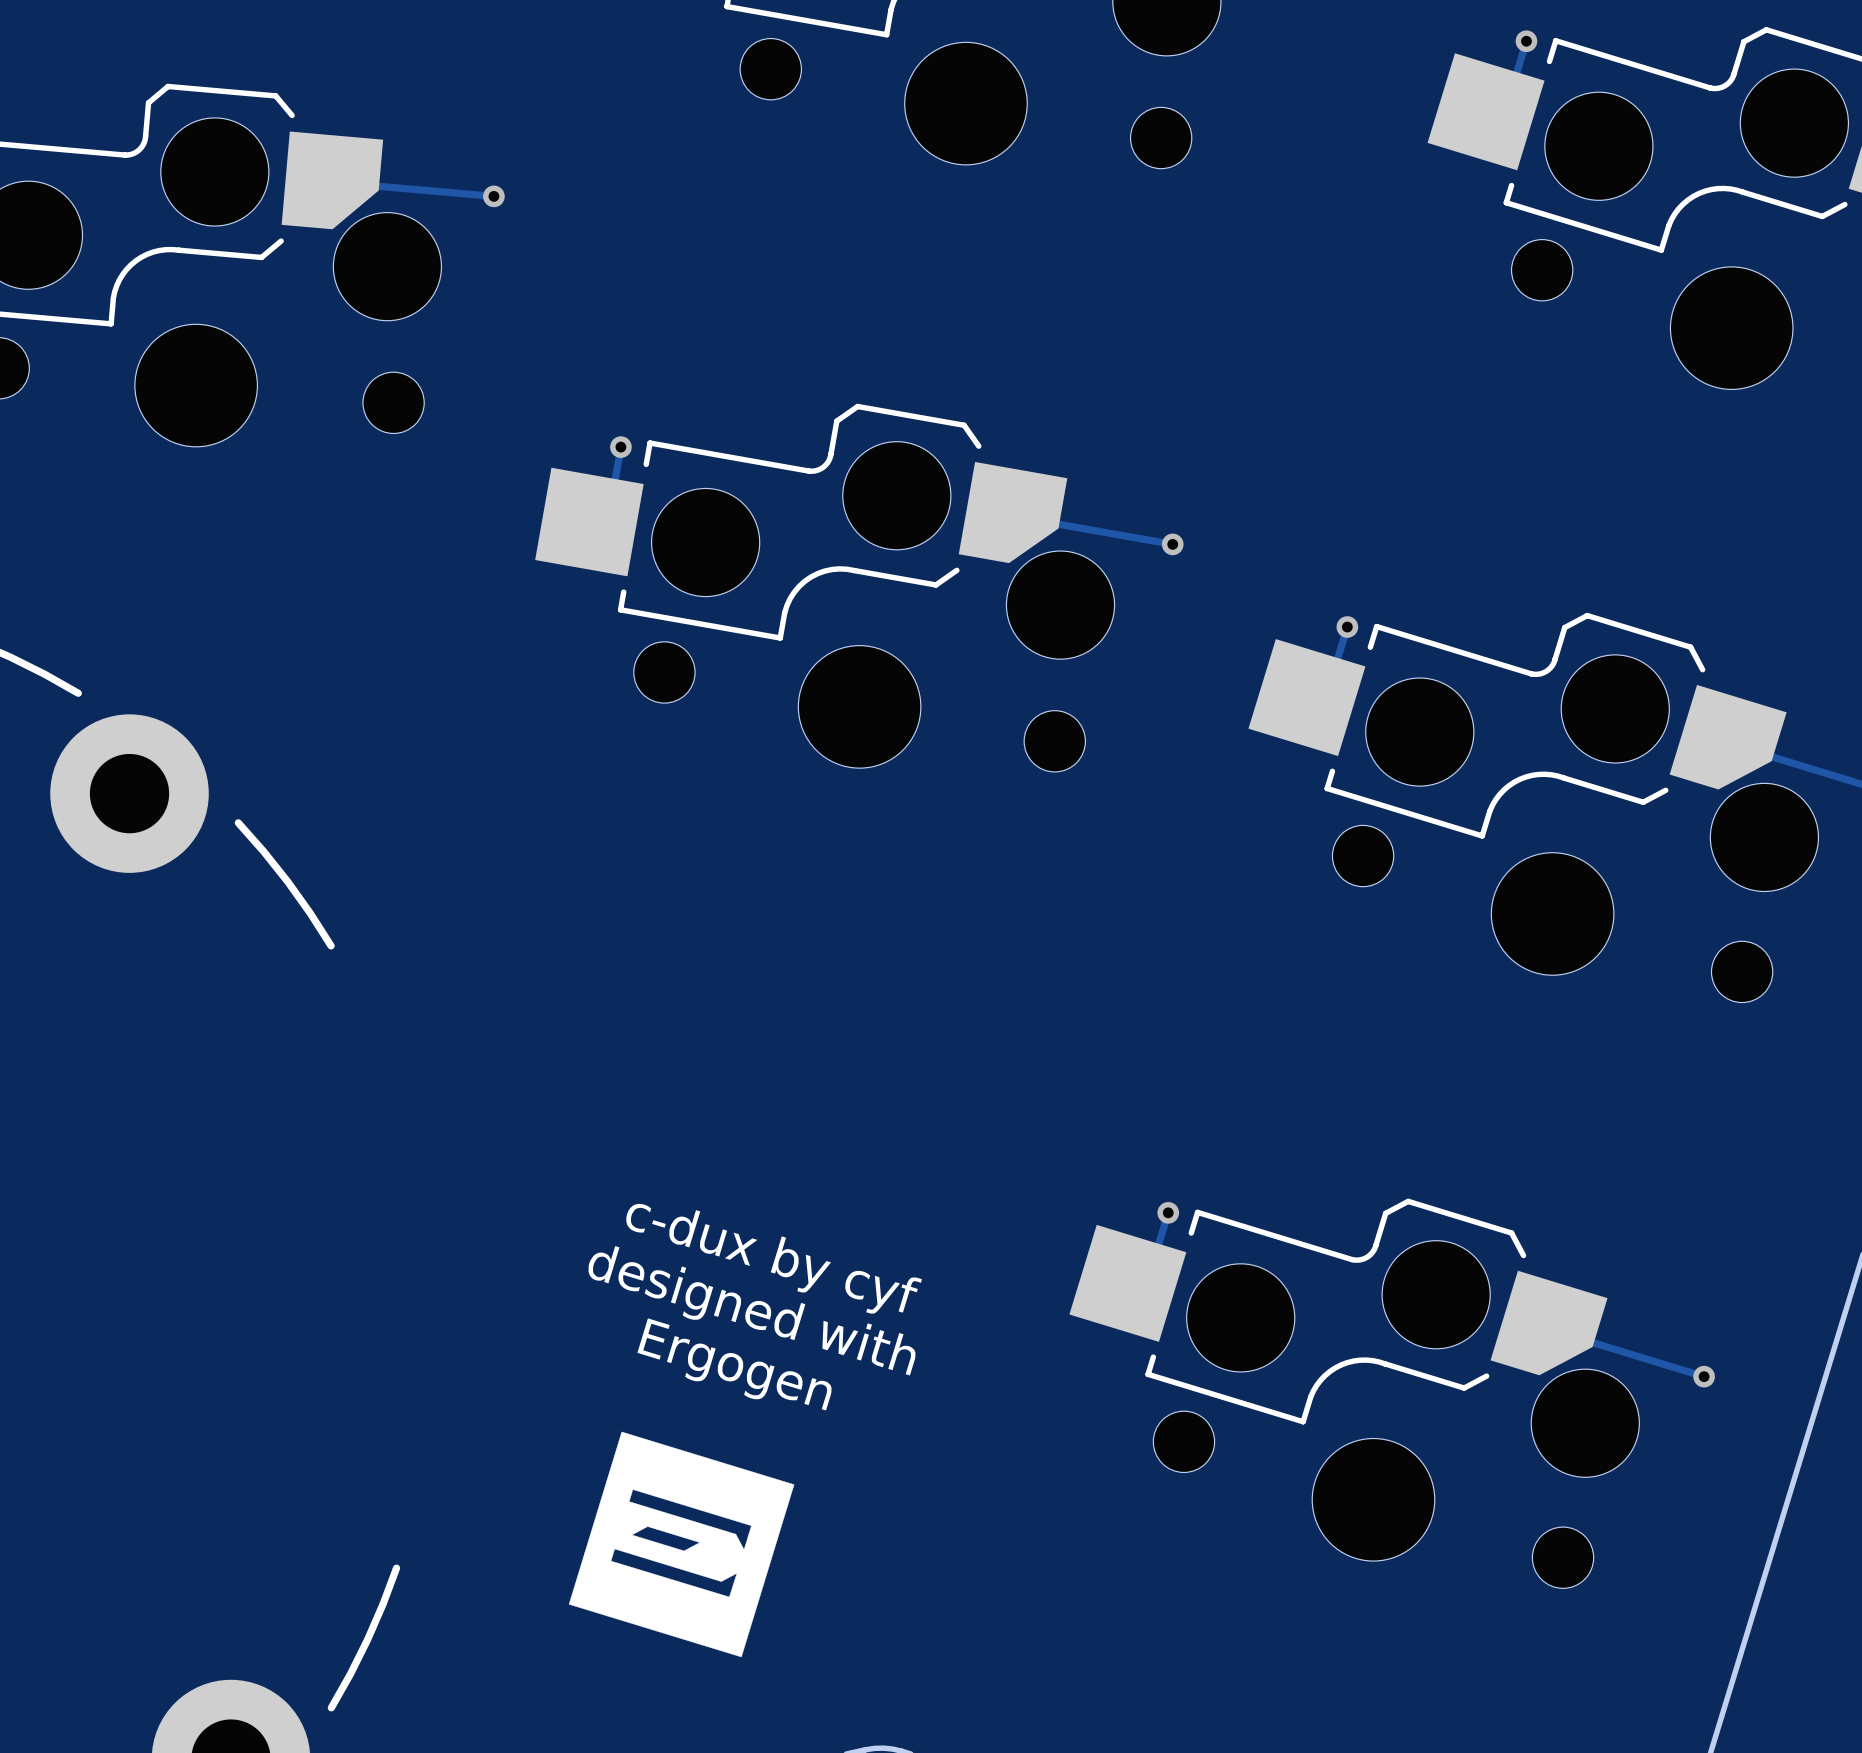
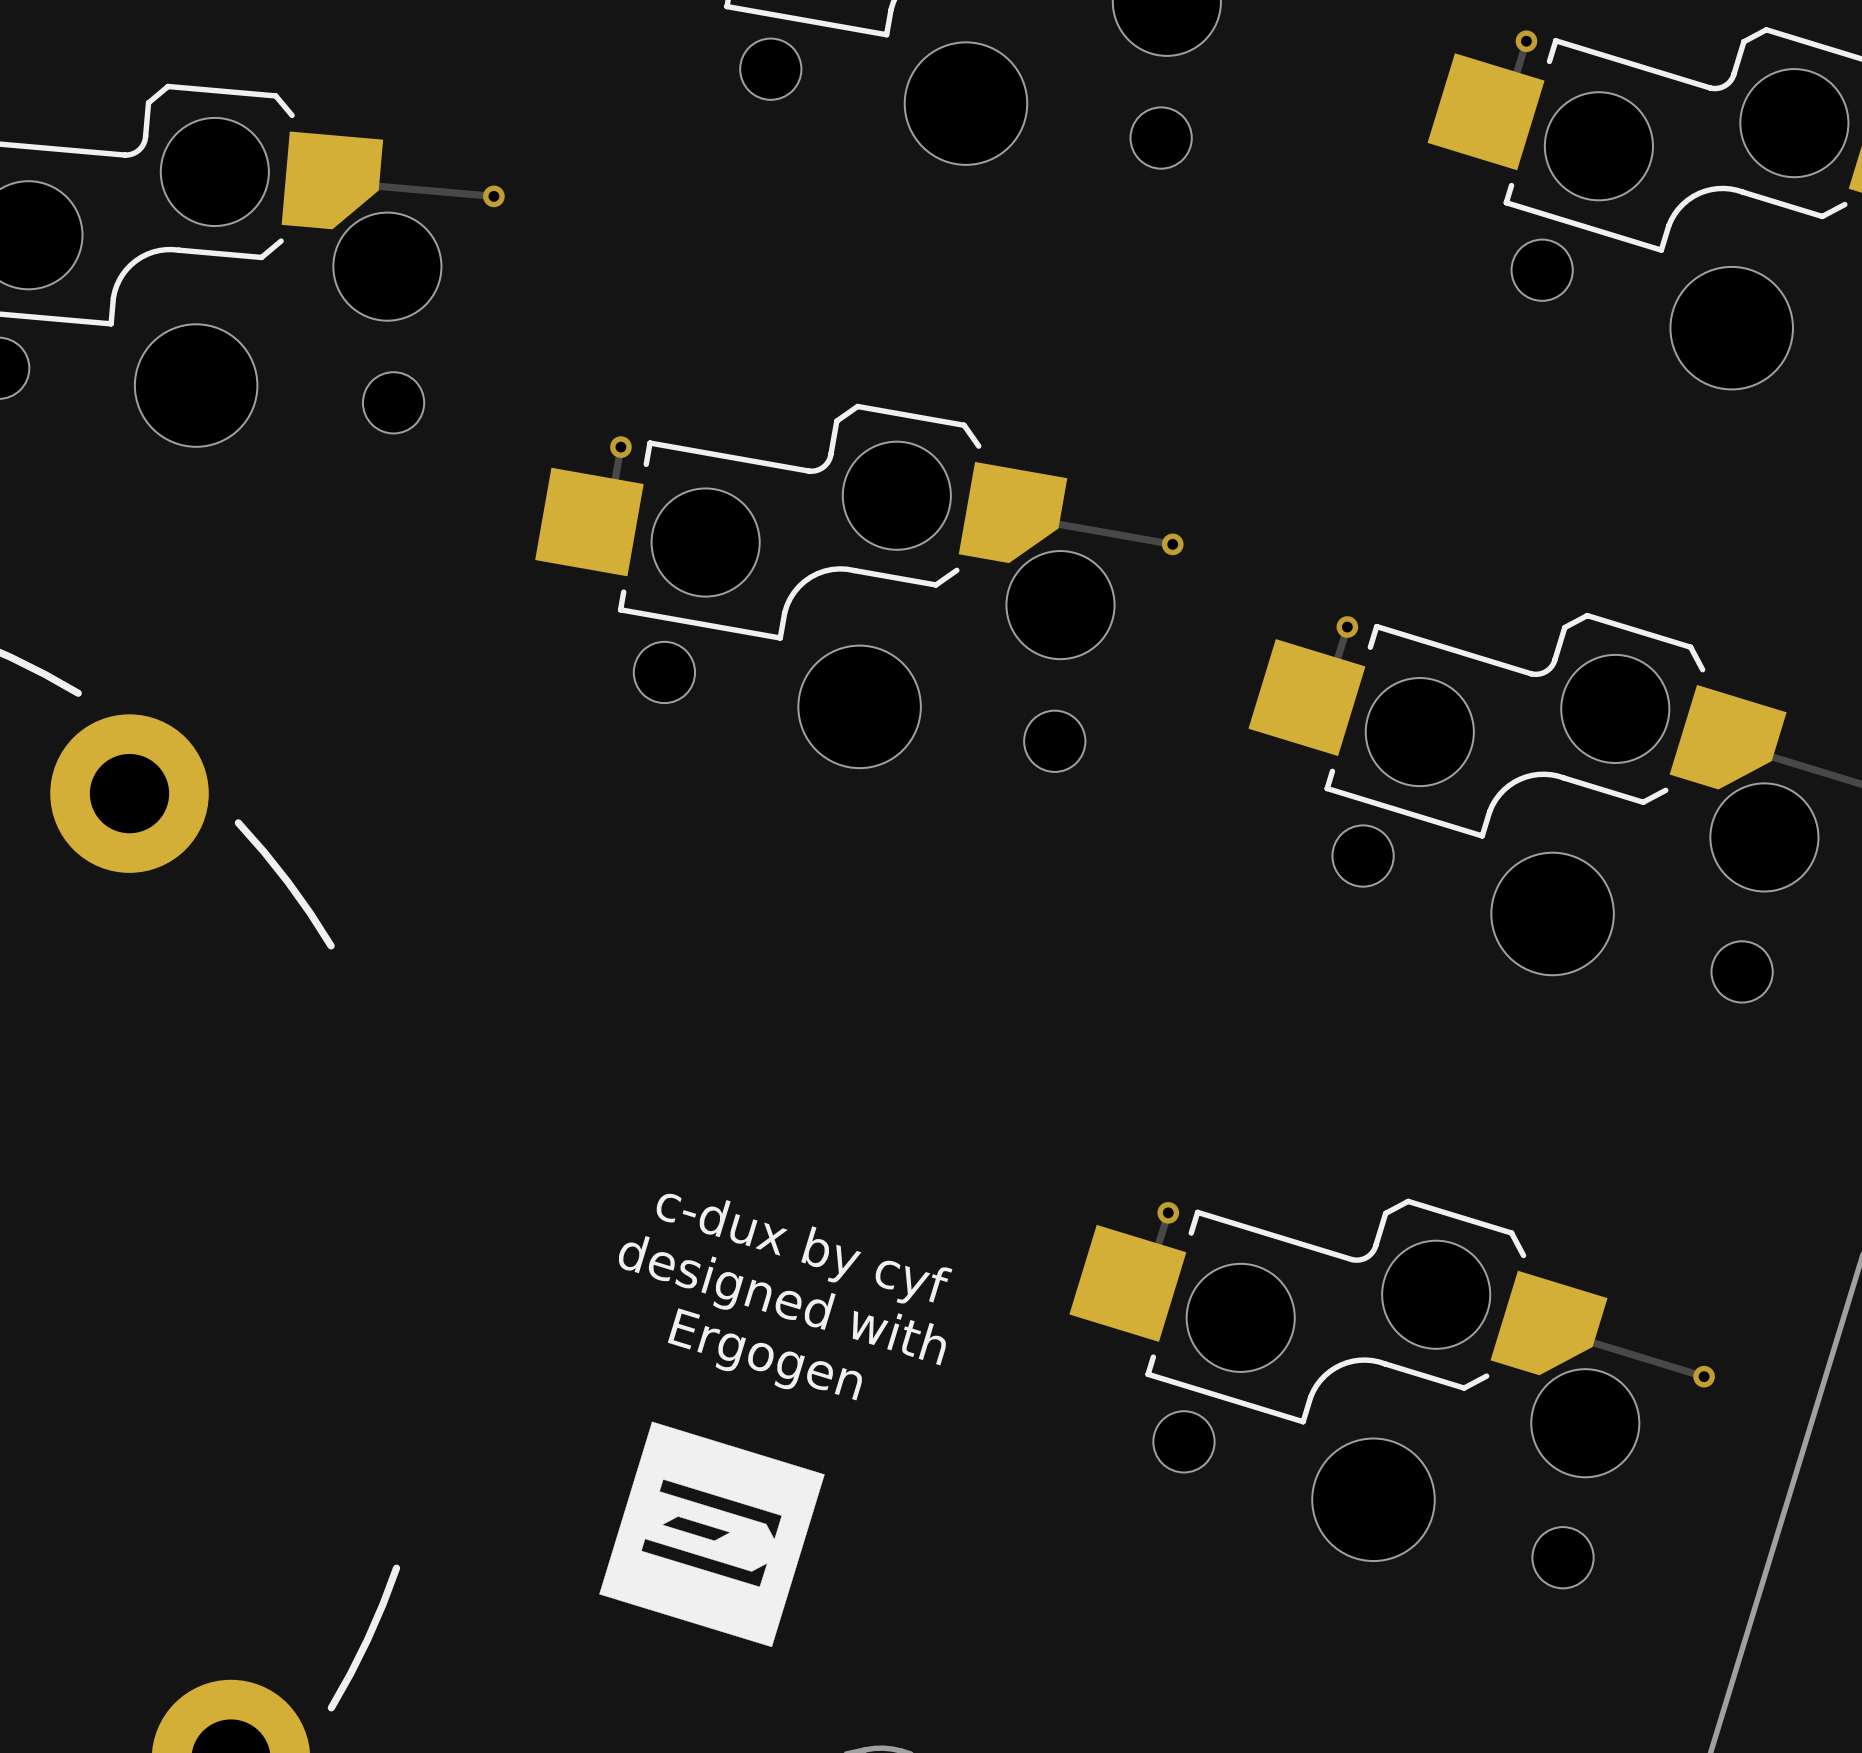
text position: c-dux by cyf (773, 1258) -> c-dux by cyf (803, 1248)
text position: designed with (751, 1310) -> designed with (782, 1300)
text position: Ergogen (734, 1364) -> Ergogen (765, 1354)
drawing position: (681, 1544) -> (711, 1534)

